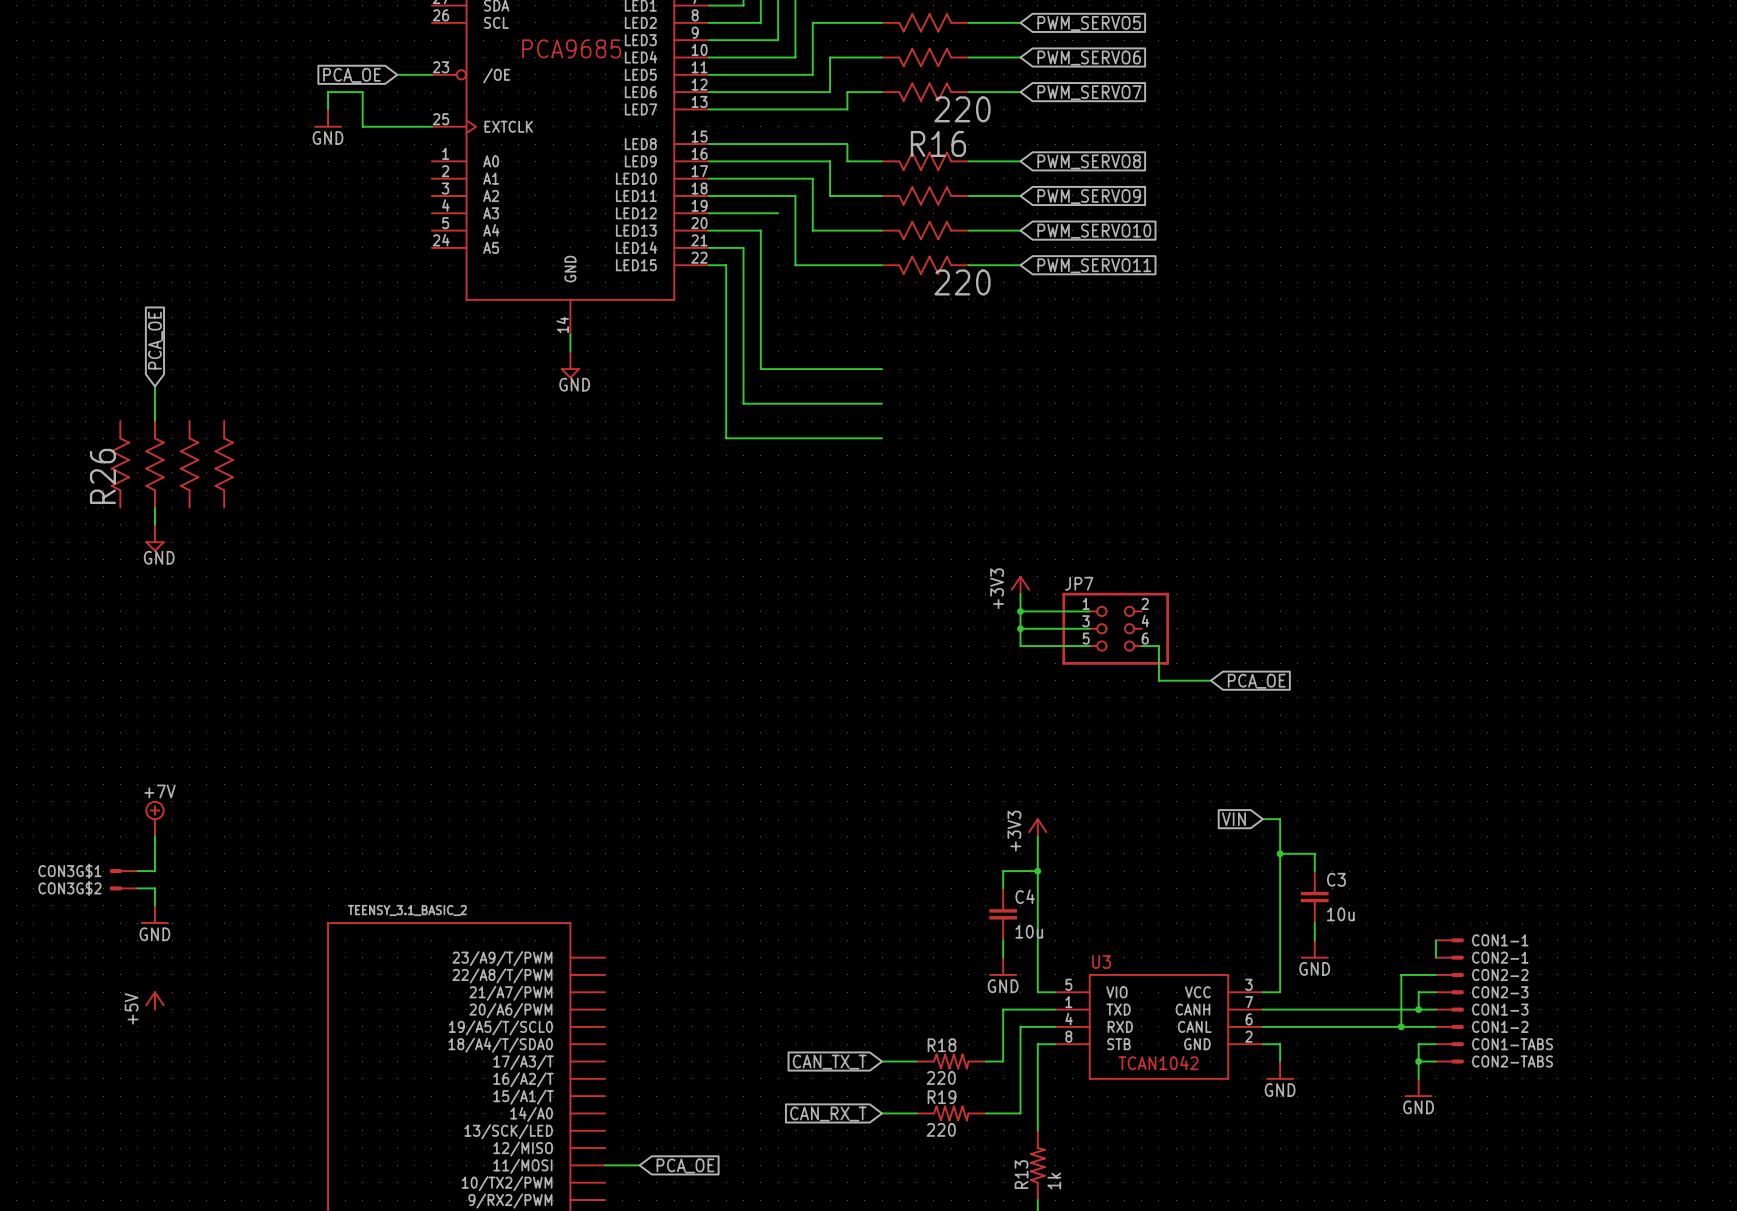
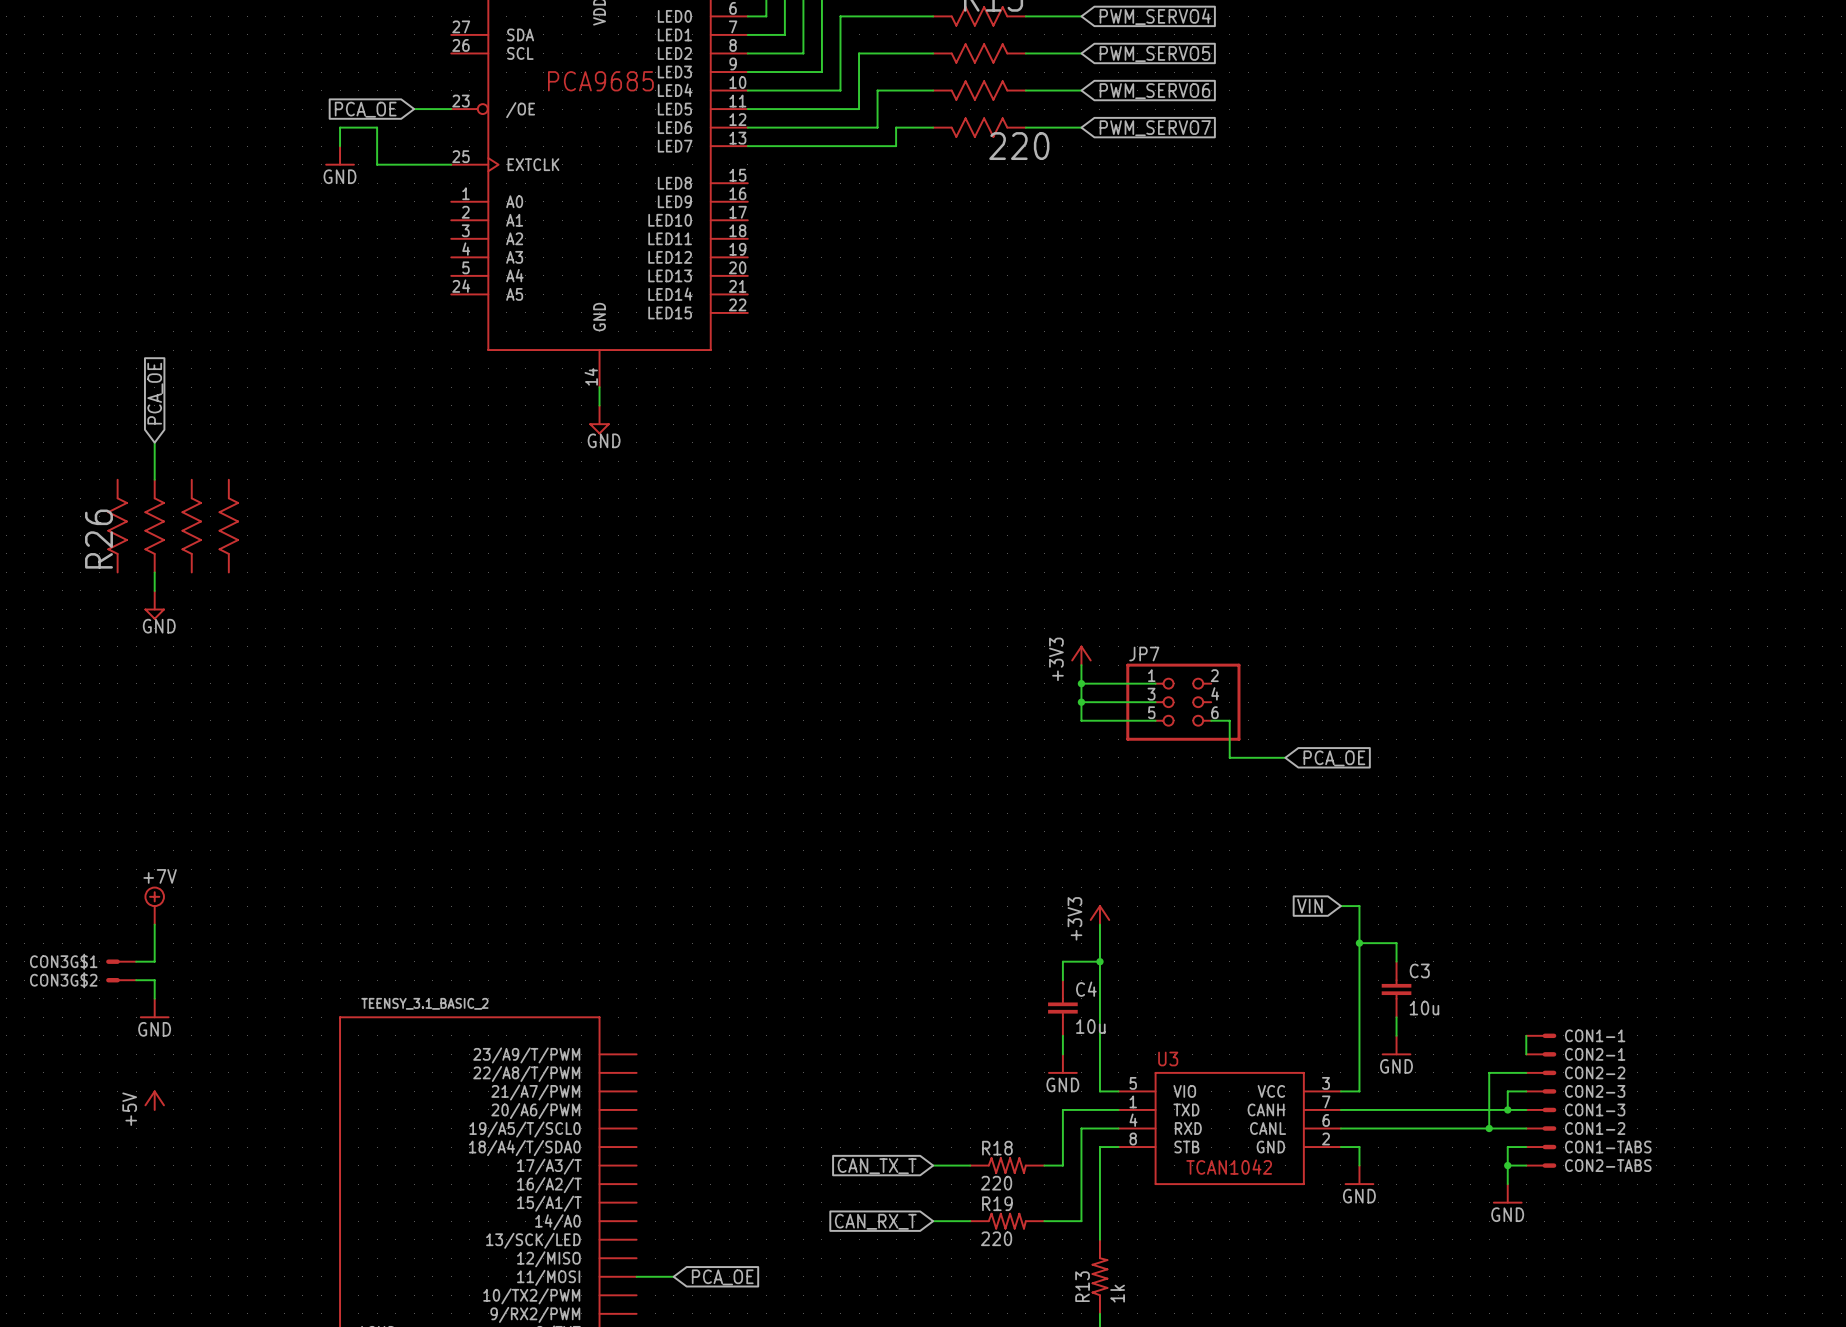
wire: (708, 144) (847, 144) (847, 161) (882, 161) -> none
wire: (708, 161) (830, 161) (830, 195) (882, 195) -> none
wire: (968, 161) (1020, 161) -> none
global label: PWM_SERVO8 (1089, 161) -> none
wire: (708, 178) (812, 178) (812, 230) (882, 230) -> none
wire: (708, 195) (795, 195) (795, 265) (882, 265) -> none
wire: (968, 195) (1020, 195) -> none
global label: PWM_SERVO9 (1089, 196) -> none
wire: (708, 213) (778, 213) -> none
R16: 220 (925, 213) -> none
wire: (708, 230) (760, 230) (760, 369) (882, 369) -> none
wire: (968, 230) (1020, 230) -> none
global label: PWM_SERVO10 (1094, 231) -> none
wire: (708, 247) (743, 247) (743, 403) (882, 403) -> none
wire: (708, 265) (726, 265) (726, 438) (882, 438) -> none
wire: (968, 265) (1020, 265) -> none
global label: PWM_SERVO11 (1094, 265) -> none

